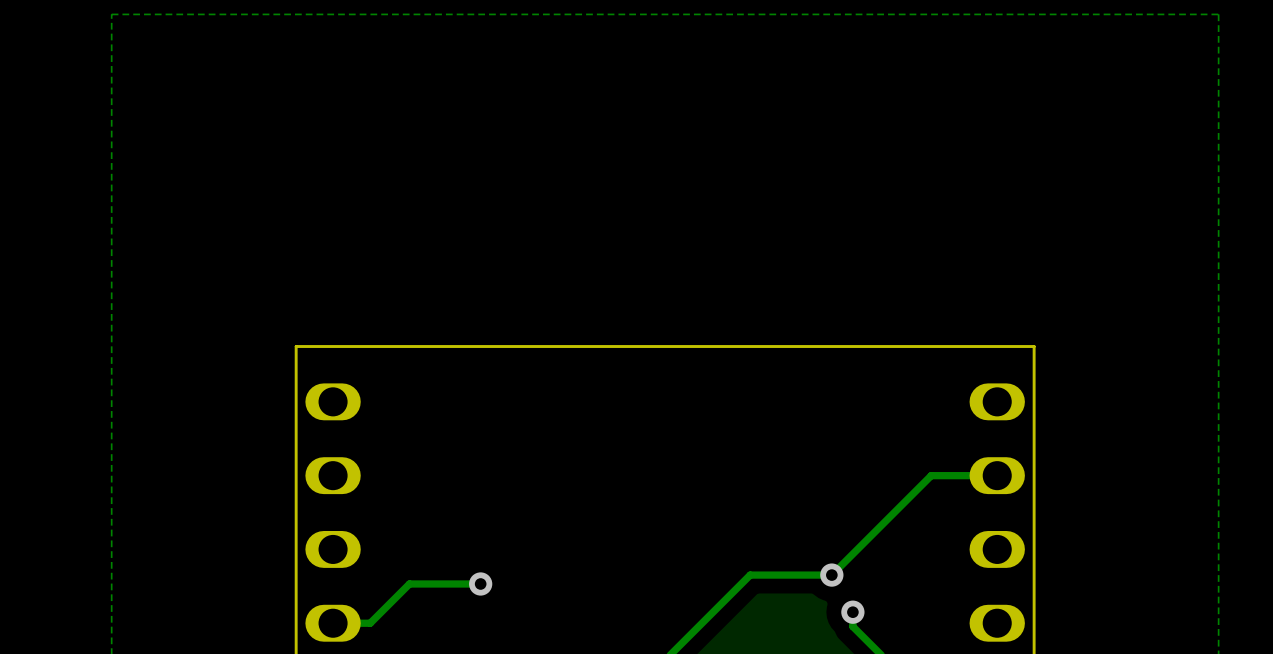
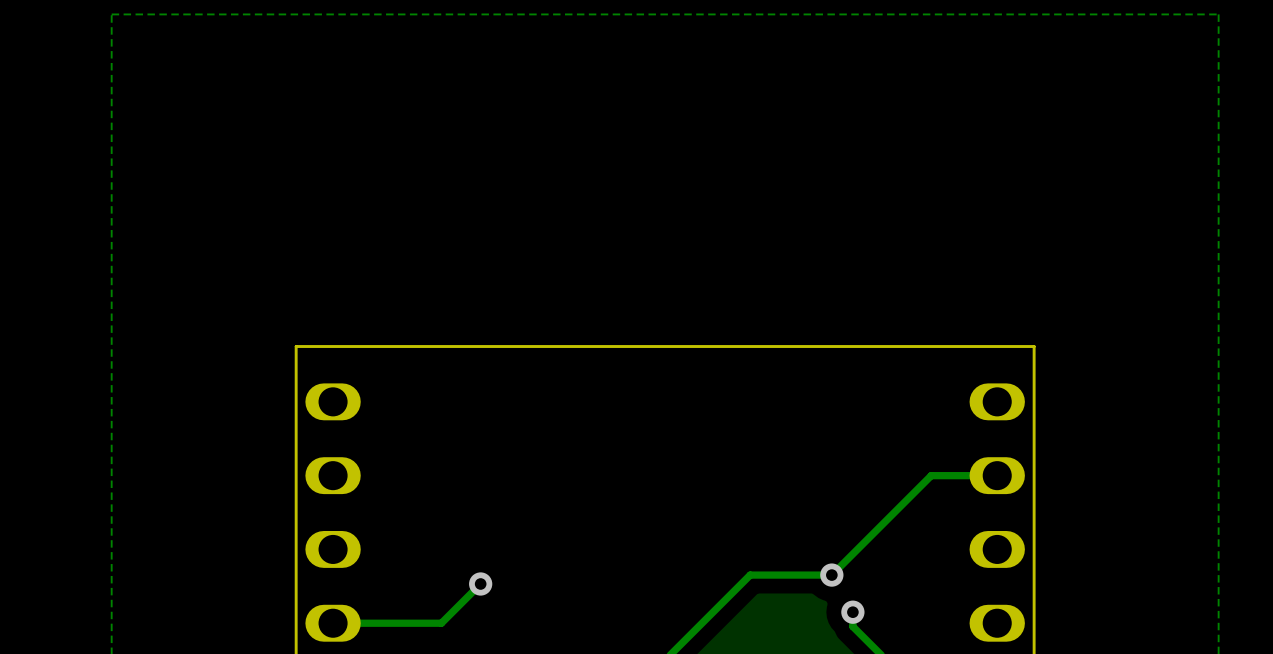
track: (480, 583) (409, 583) (370, 623) -> (480, 583) (441, 623) (370, 623)

